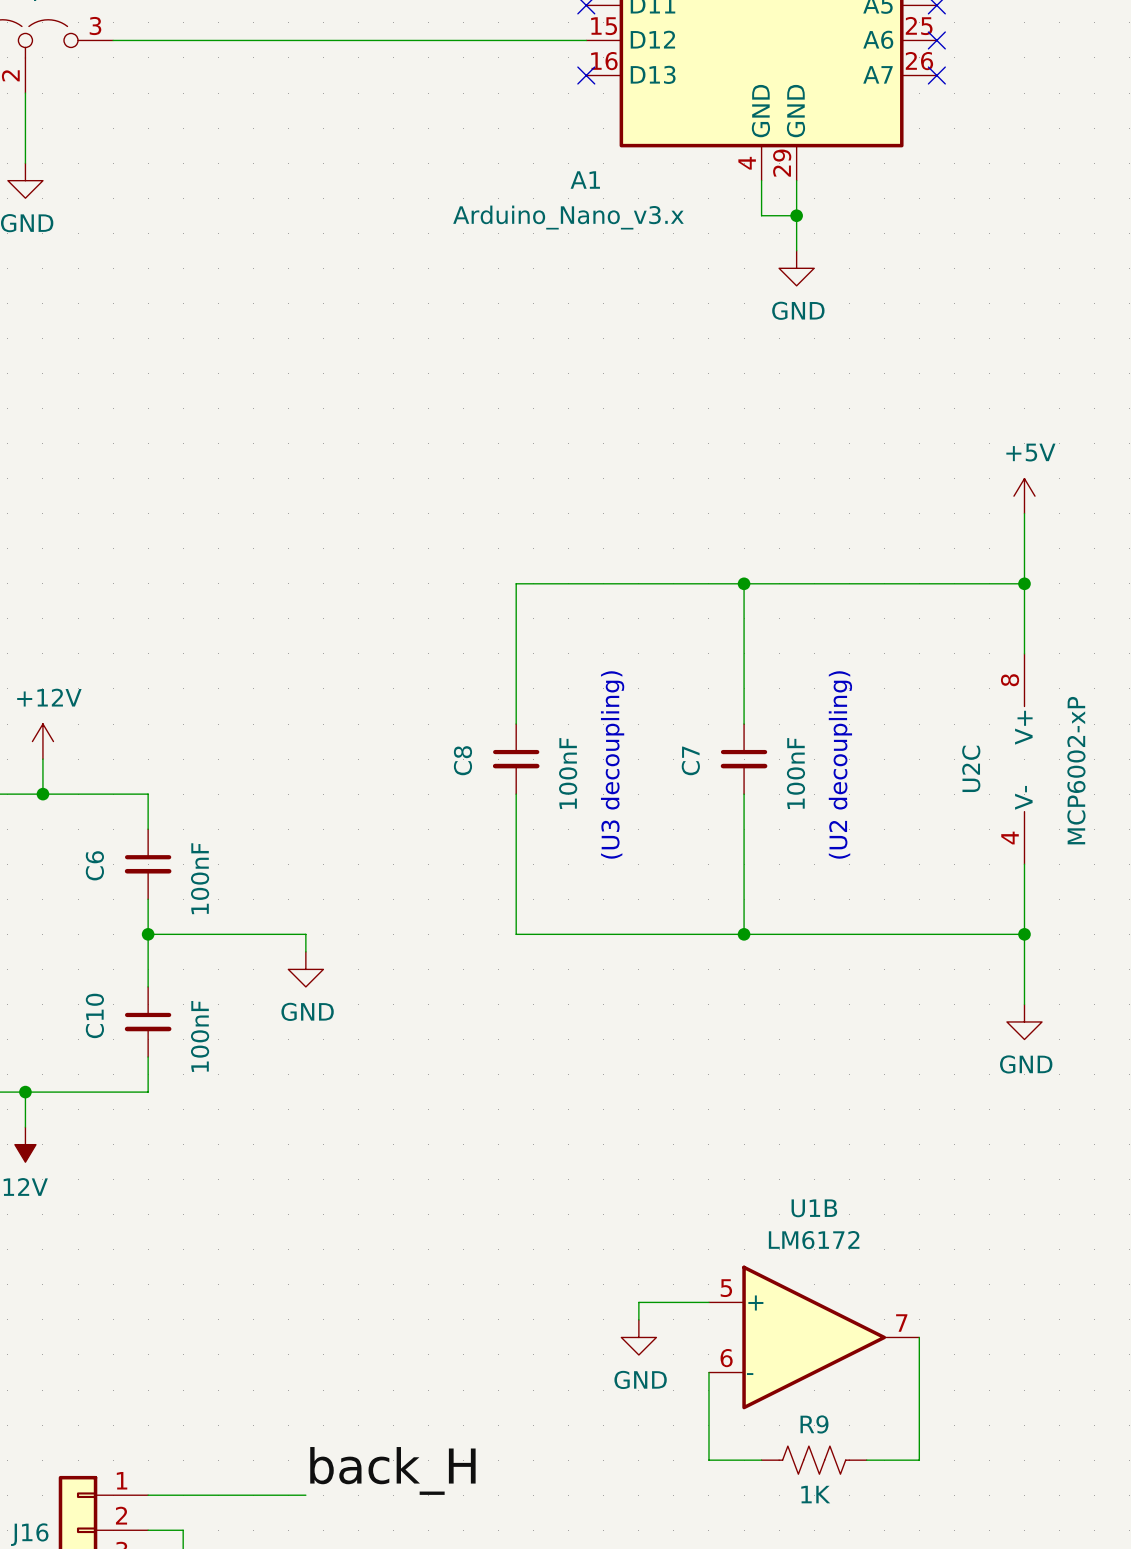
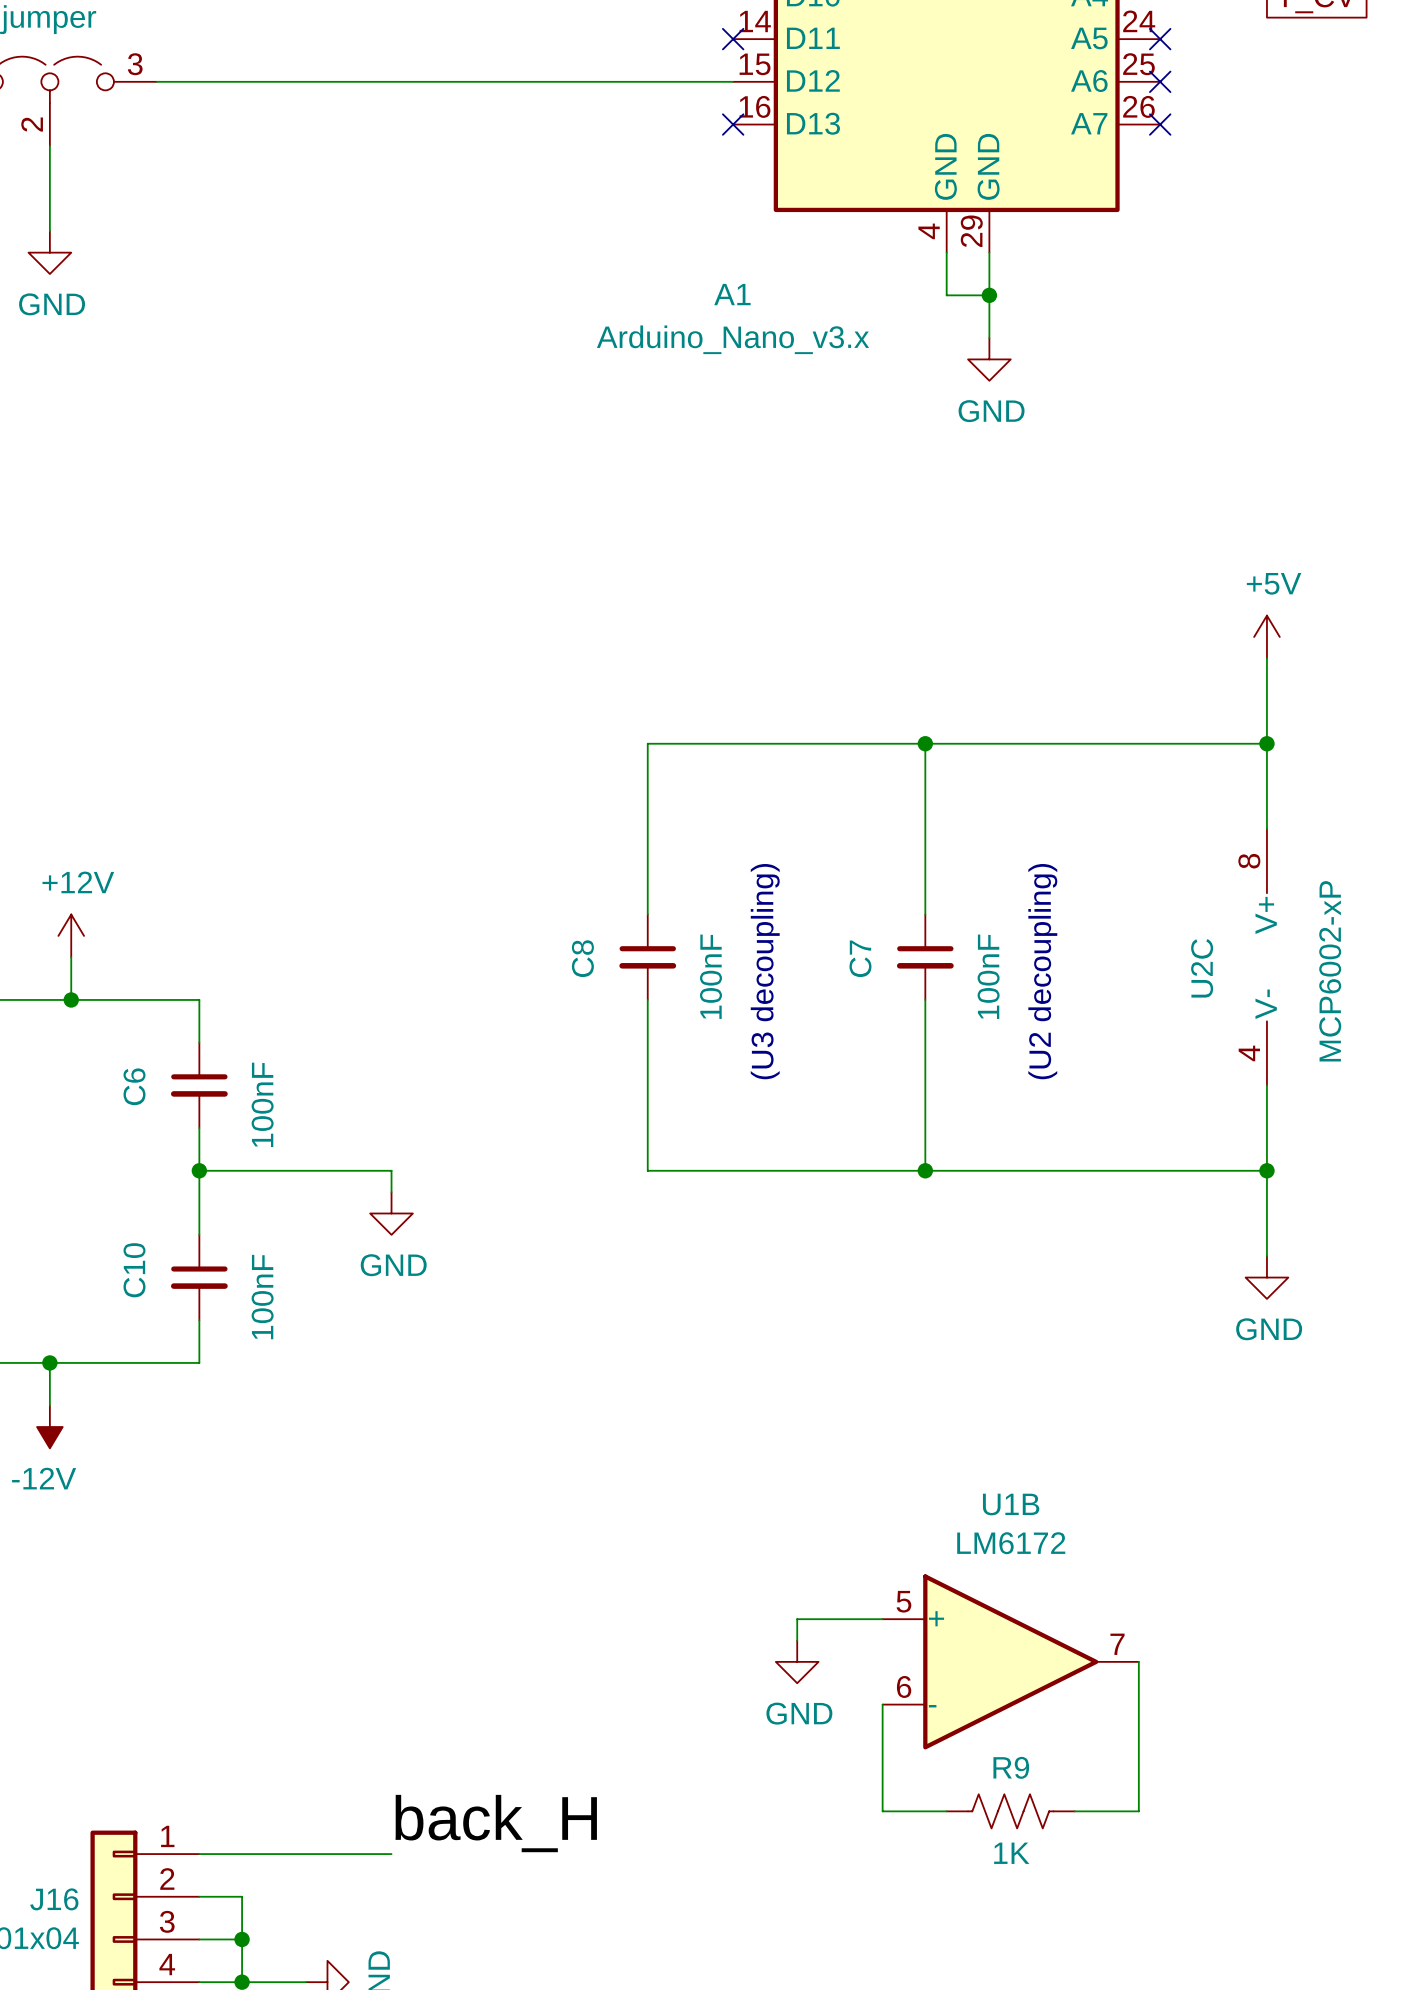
A1 name position: A1 (585, 180) -> A1 (732, 294)
A1 value position: Arduino_Nano_v3.x (568, 217) -> Arduino_Nano_v3.x (733, 339)

